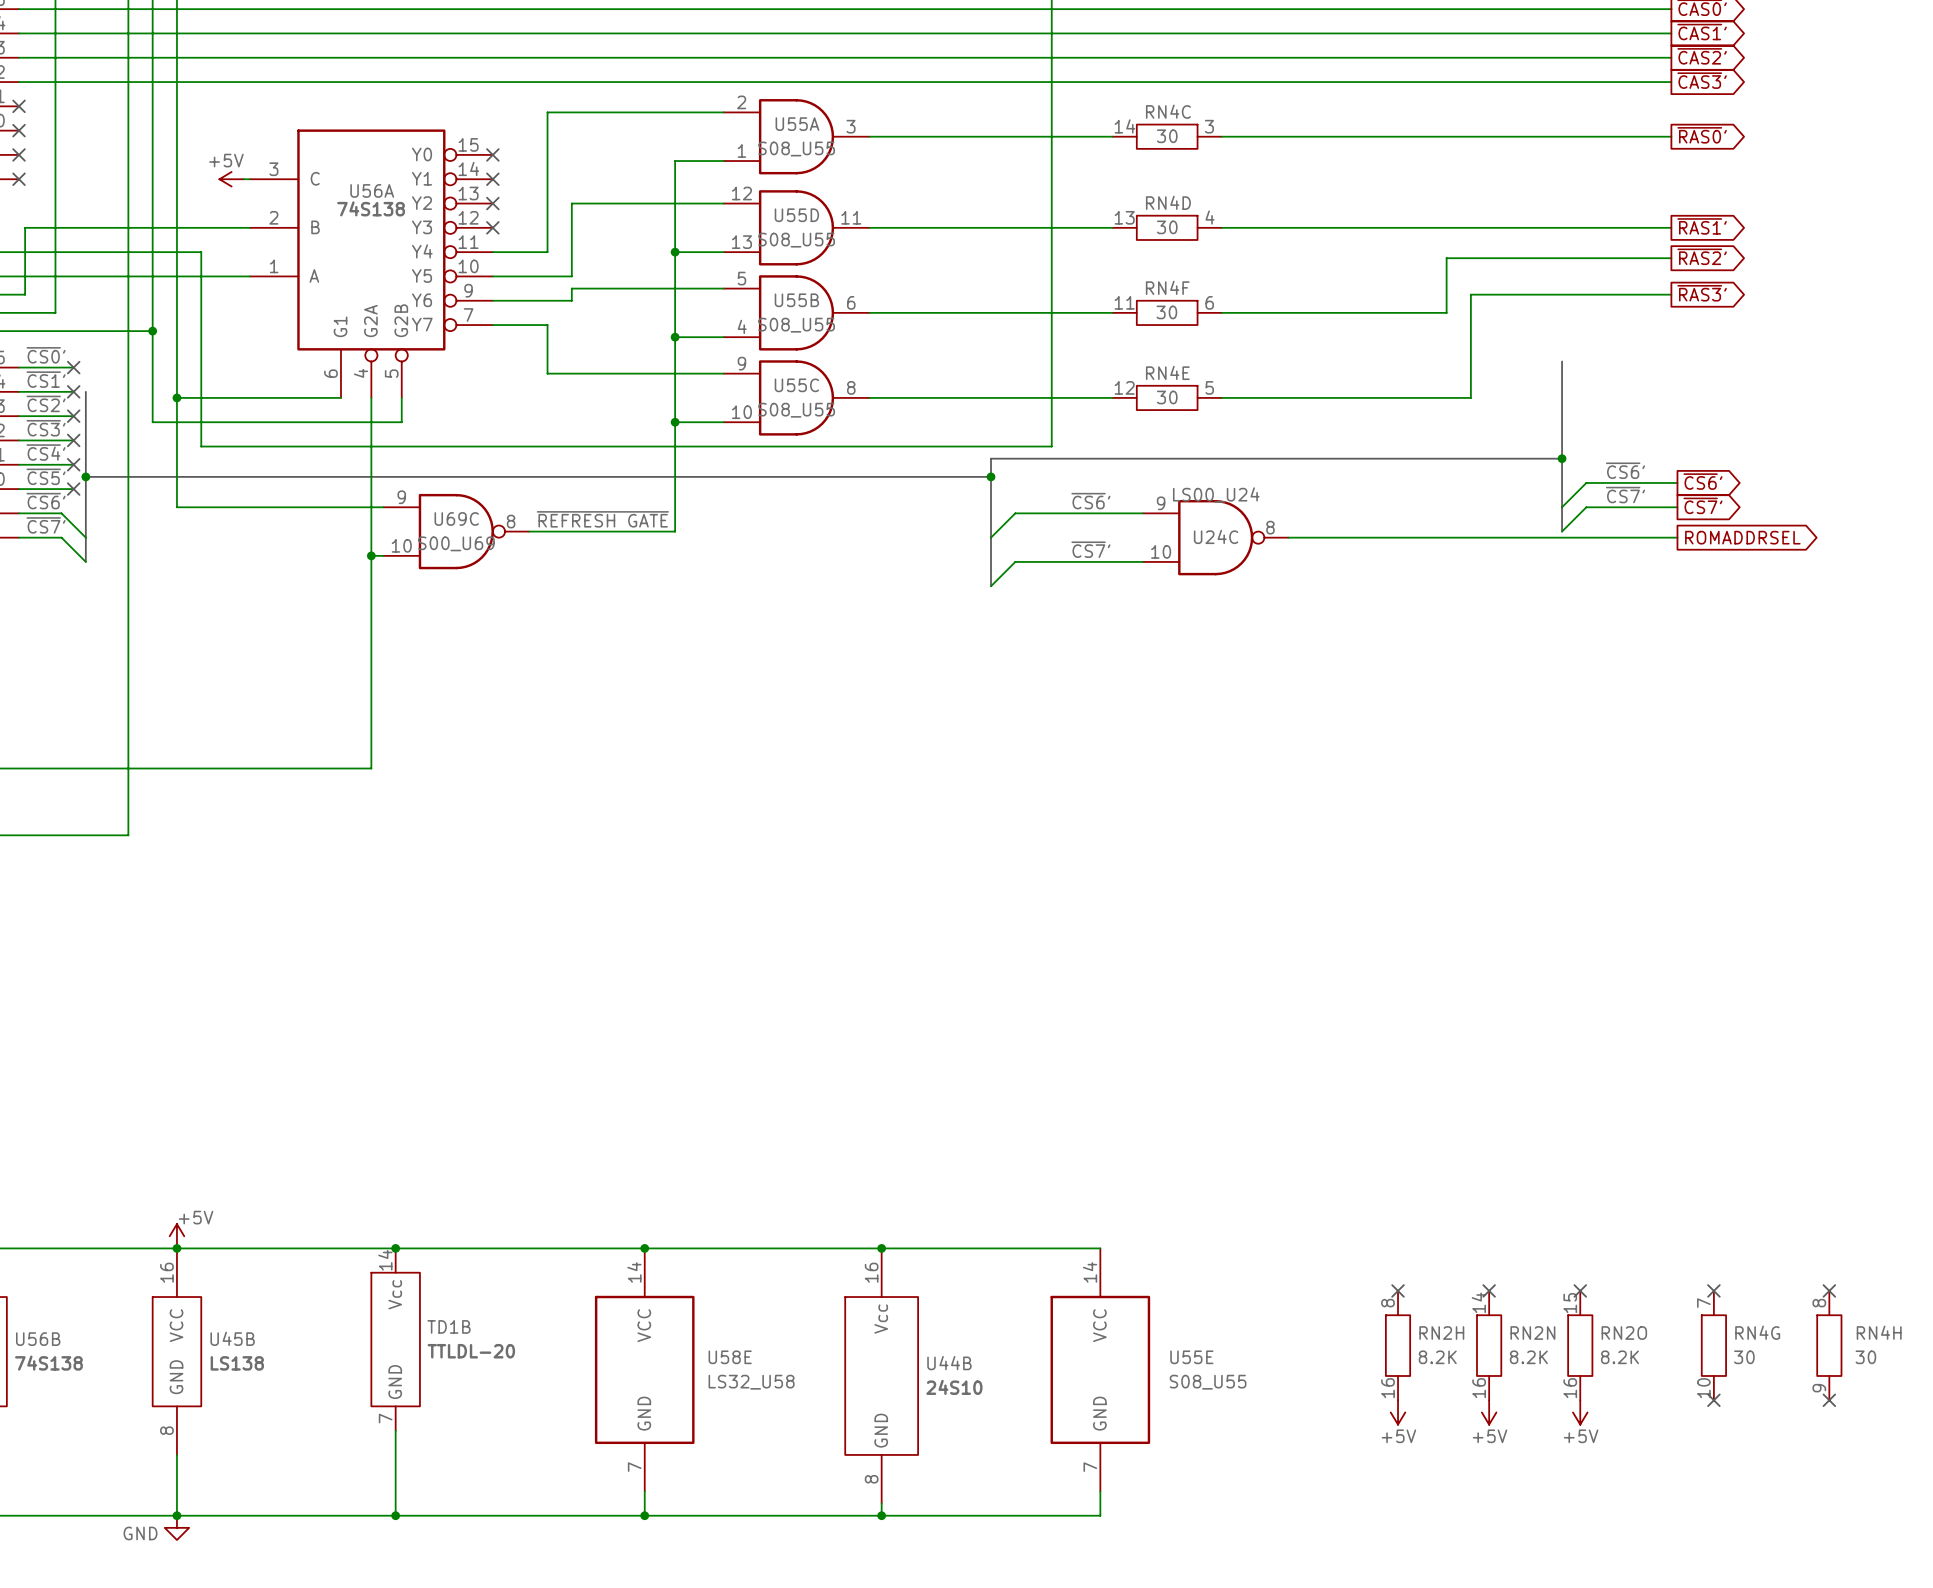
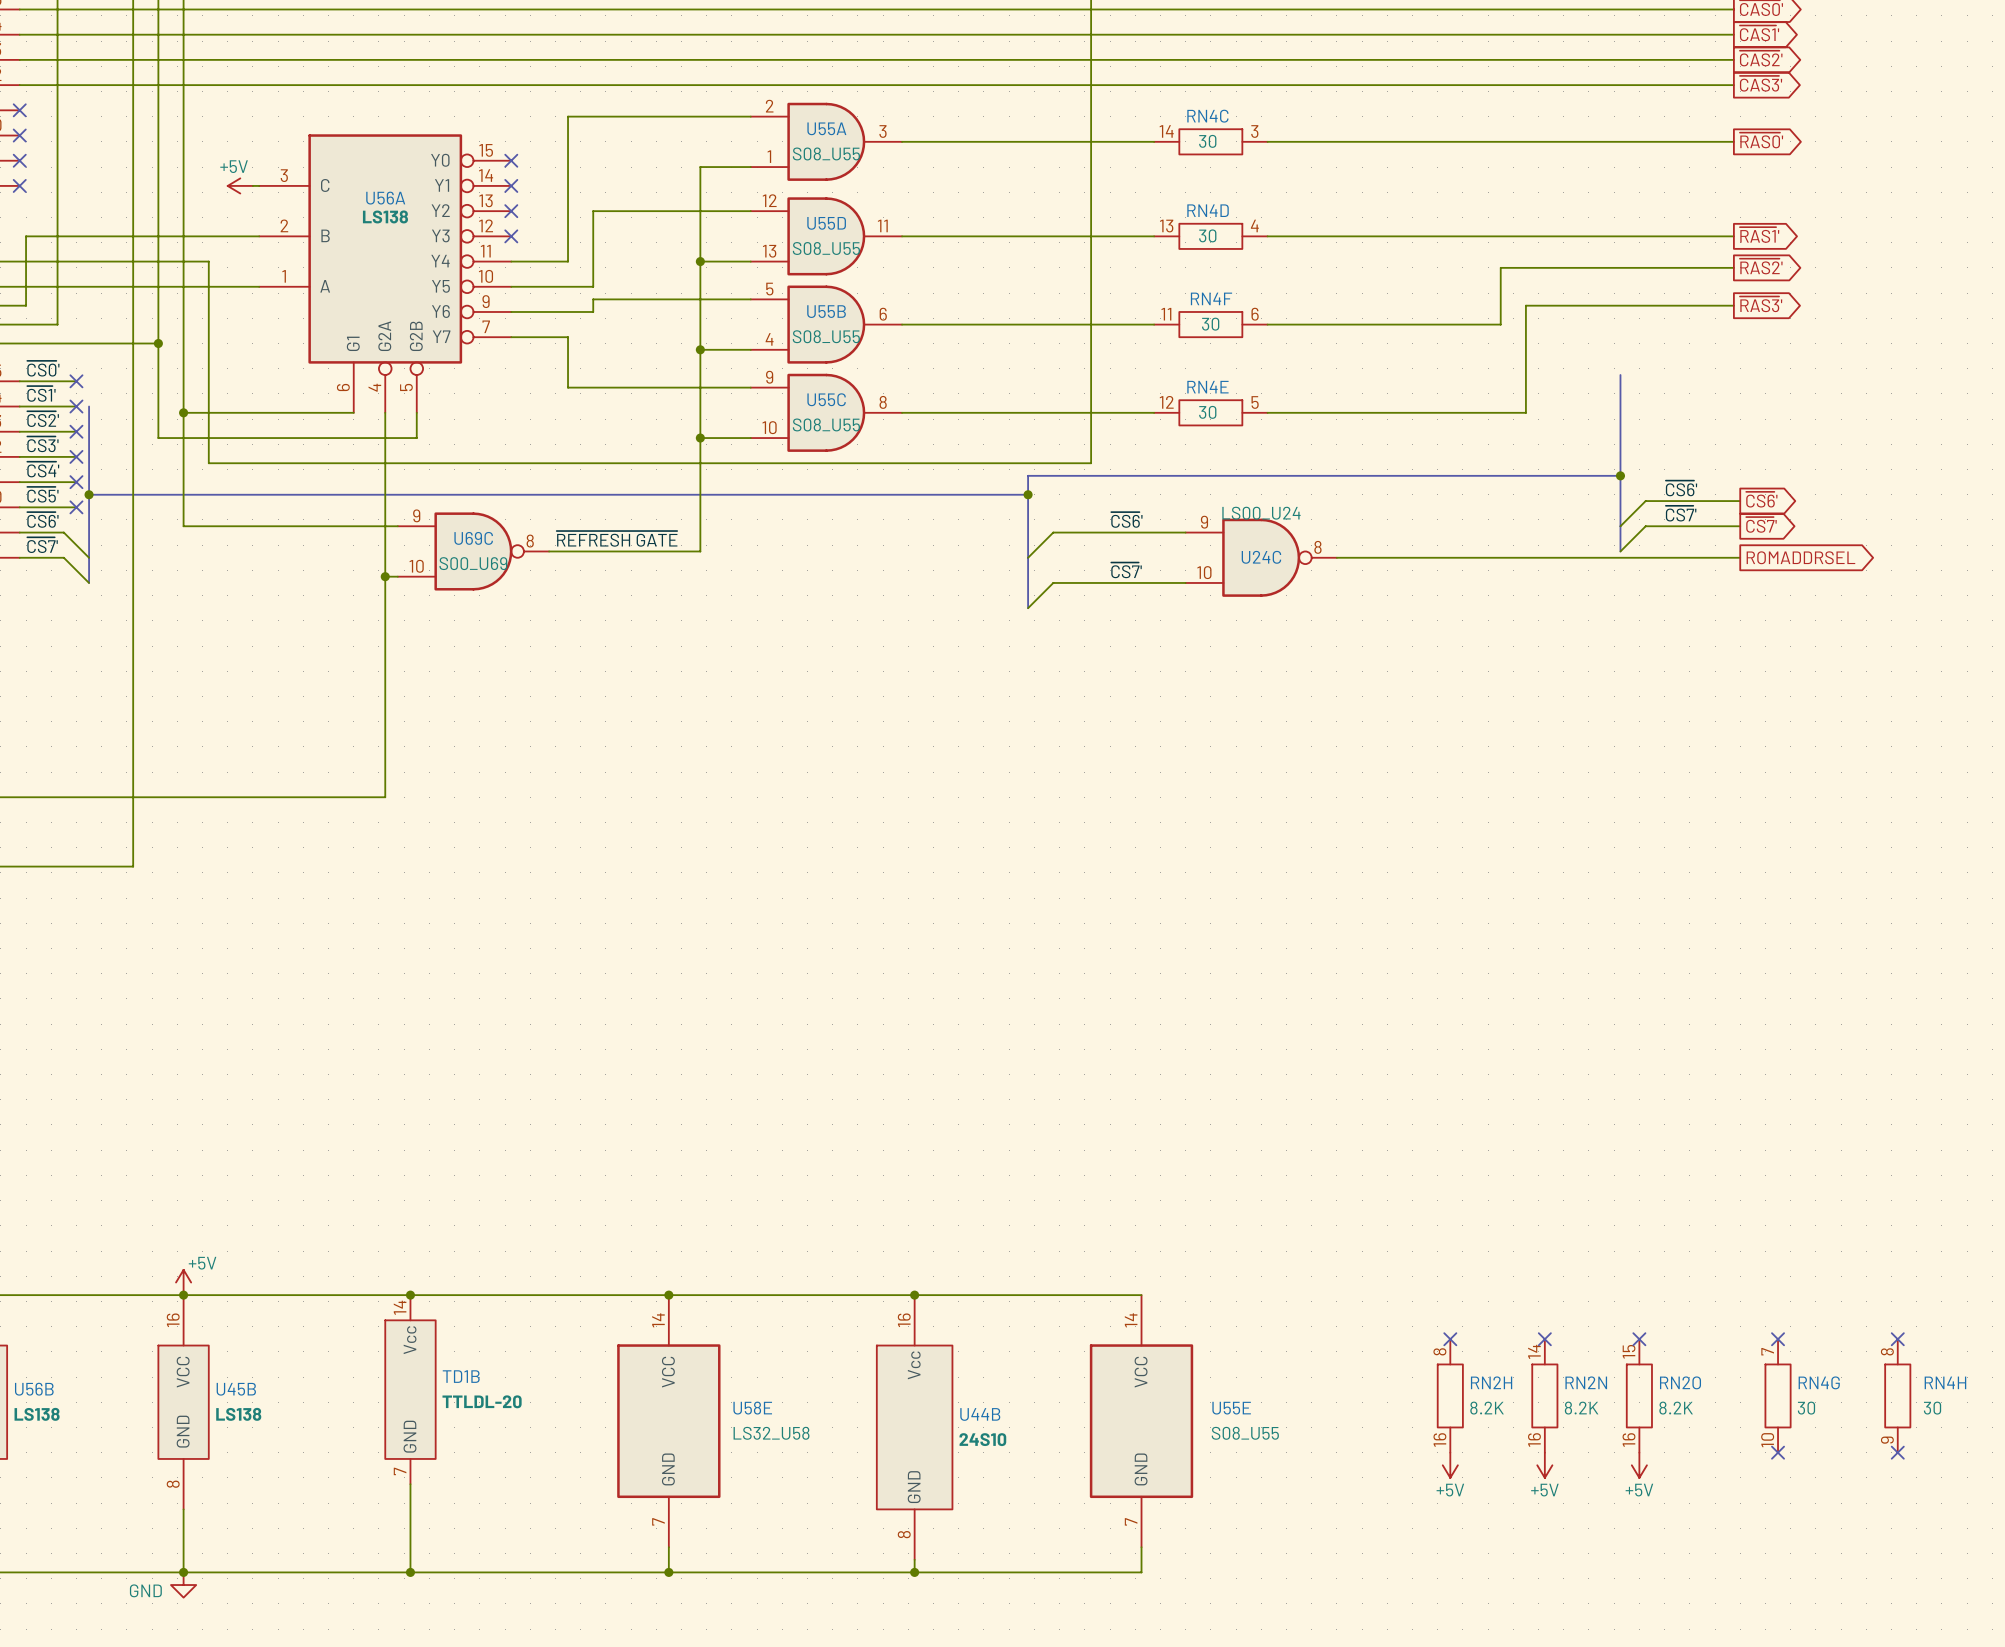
U56A value: 74S138 (371, 208) -> LS138 (385, 216)
U56B value: 74S138 (48, 1363) -> LS138 (37, 1414)

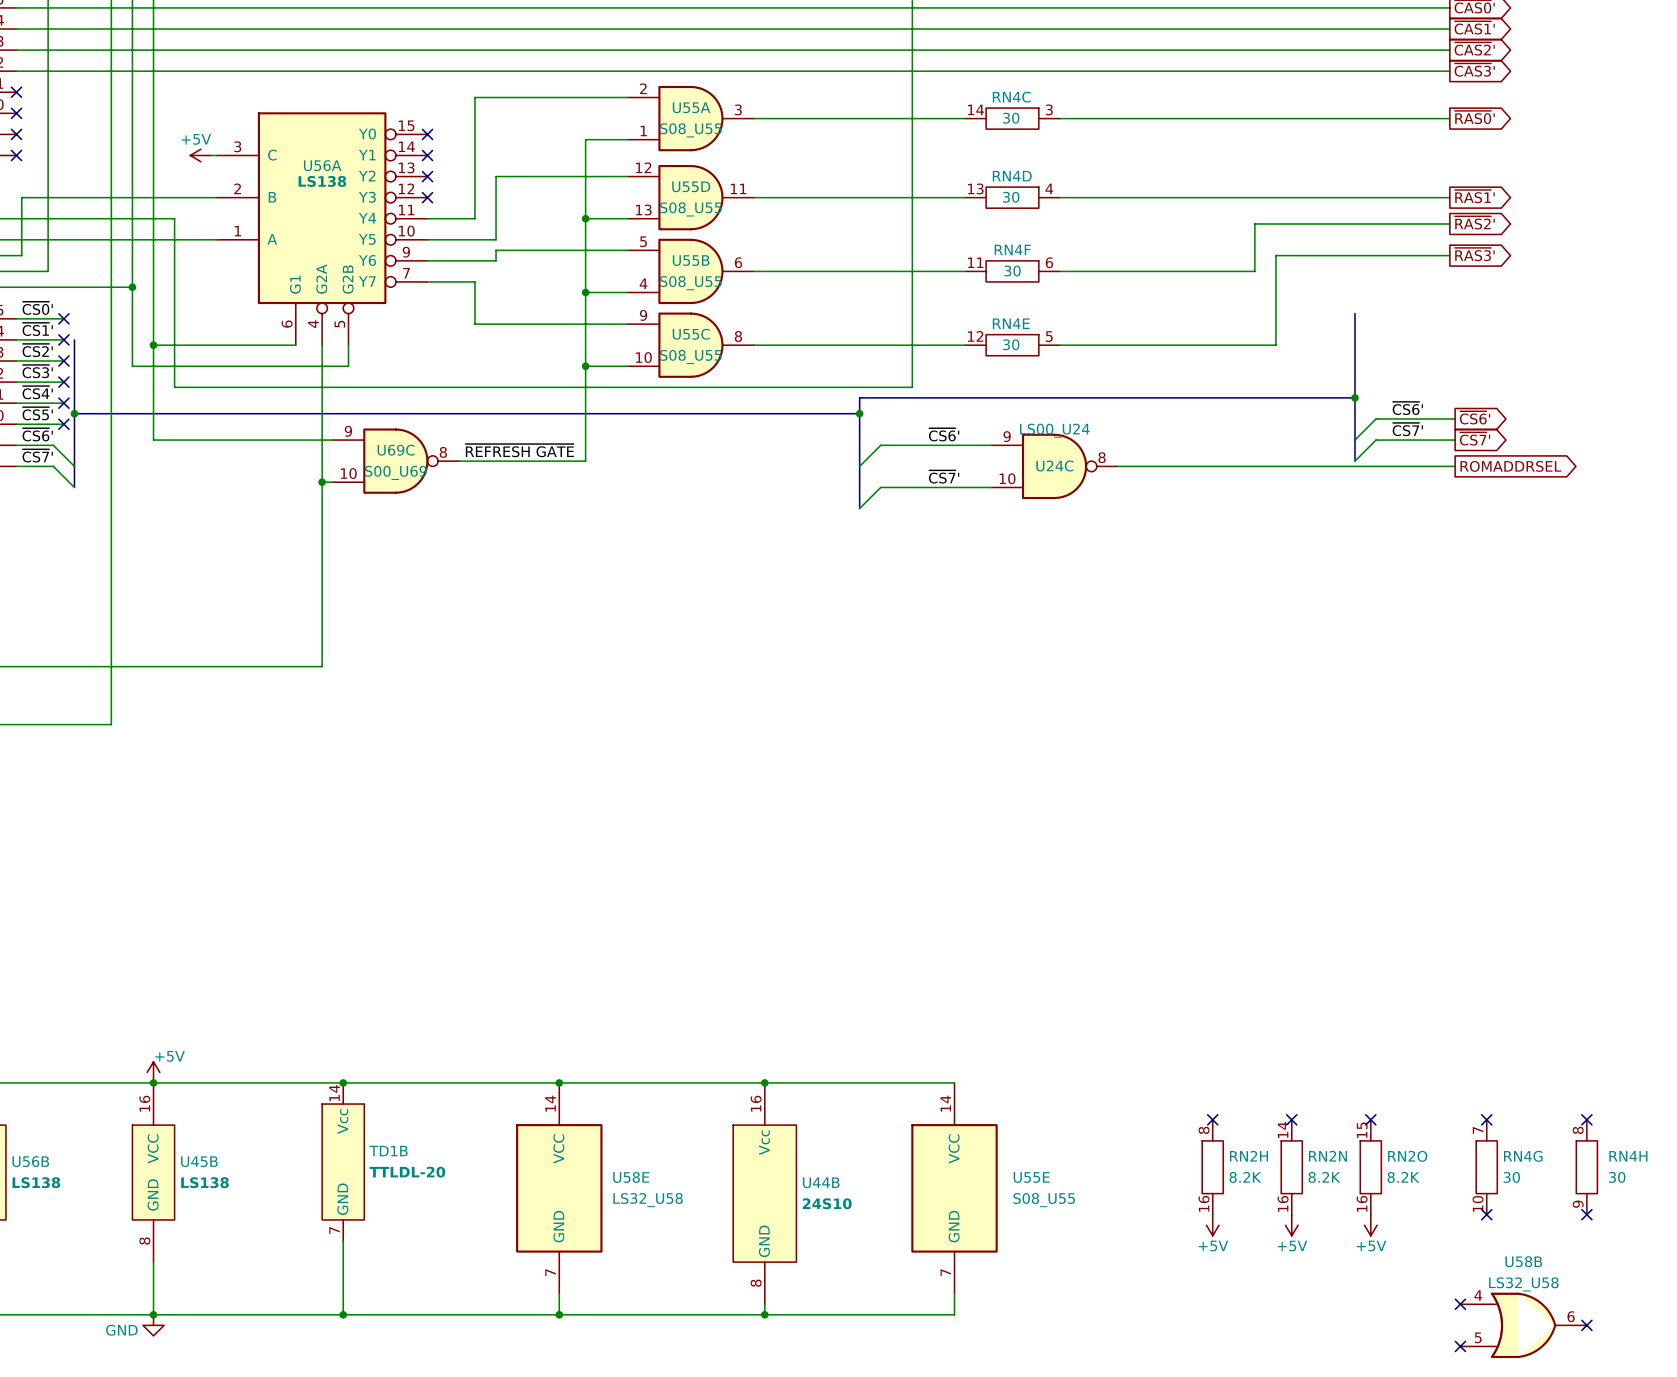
no-connect mark: none -> (1460, 1304)
U58B: none -> LS32_U58 (1523, 1325)
no-connect mark: none -> (1586, 1325)
no-connect mark: none -> (1460, 1346)

